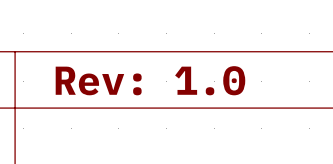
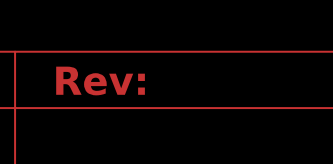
title block: Rev: 1.0 (150, 80) -> Rev: (100, 81)

